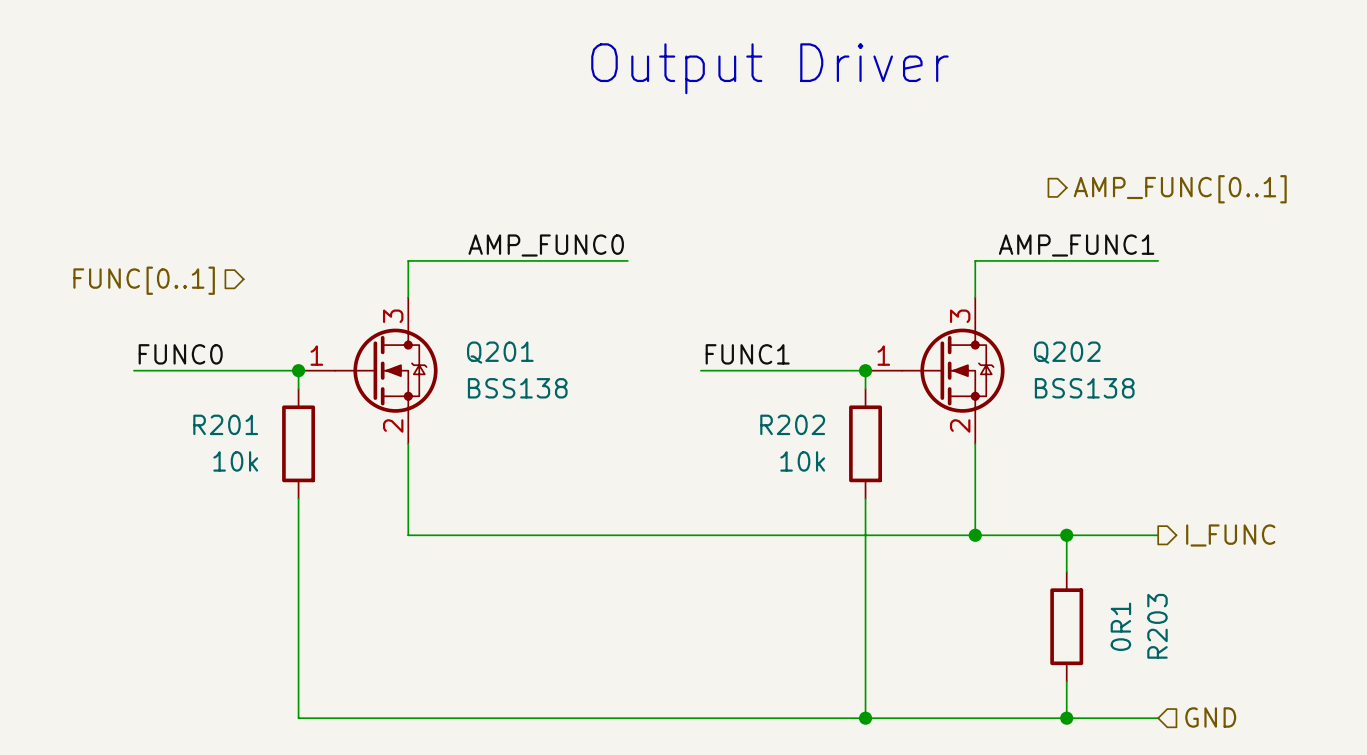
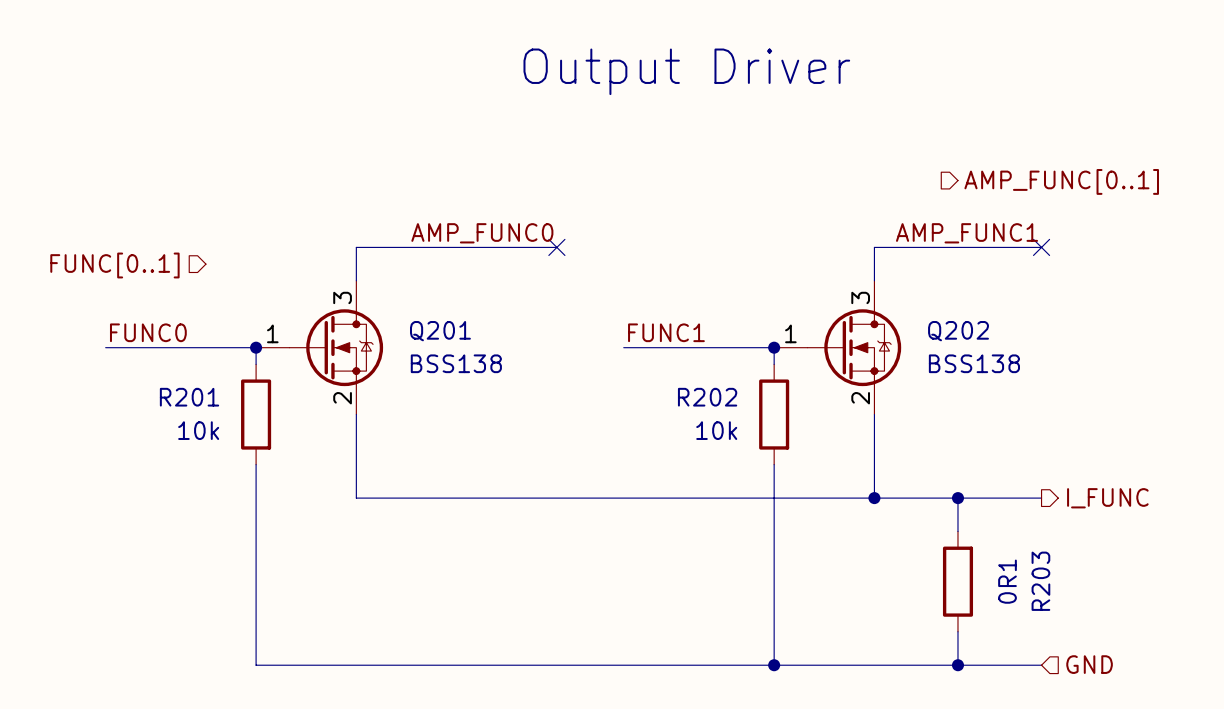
no-connect mark: none -> (556, 247)
no-connect mark: none -> (1041, 247)

